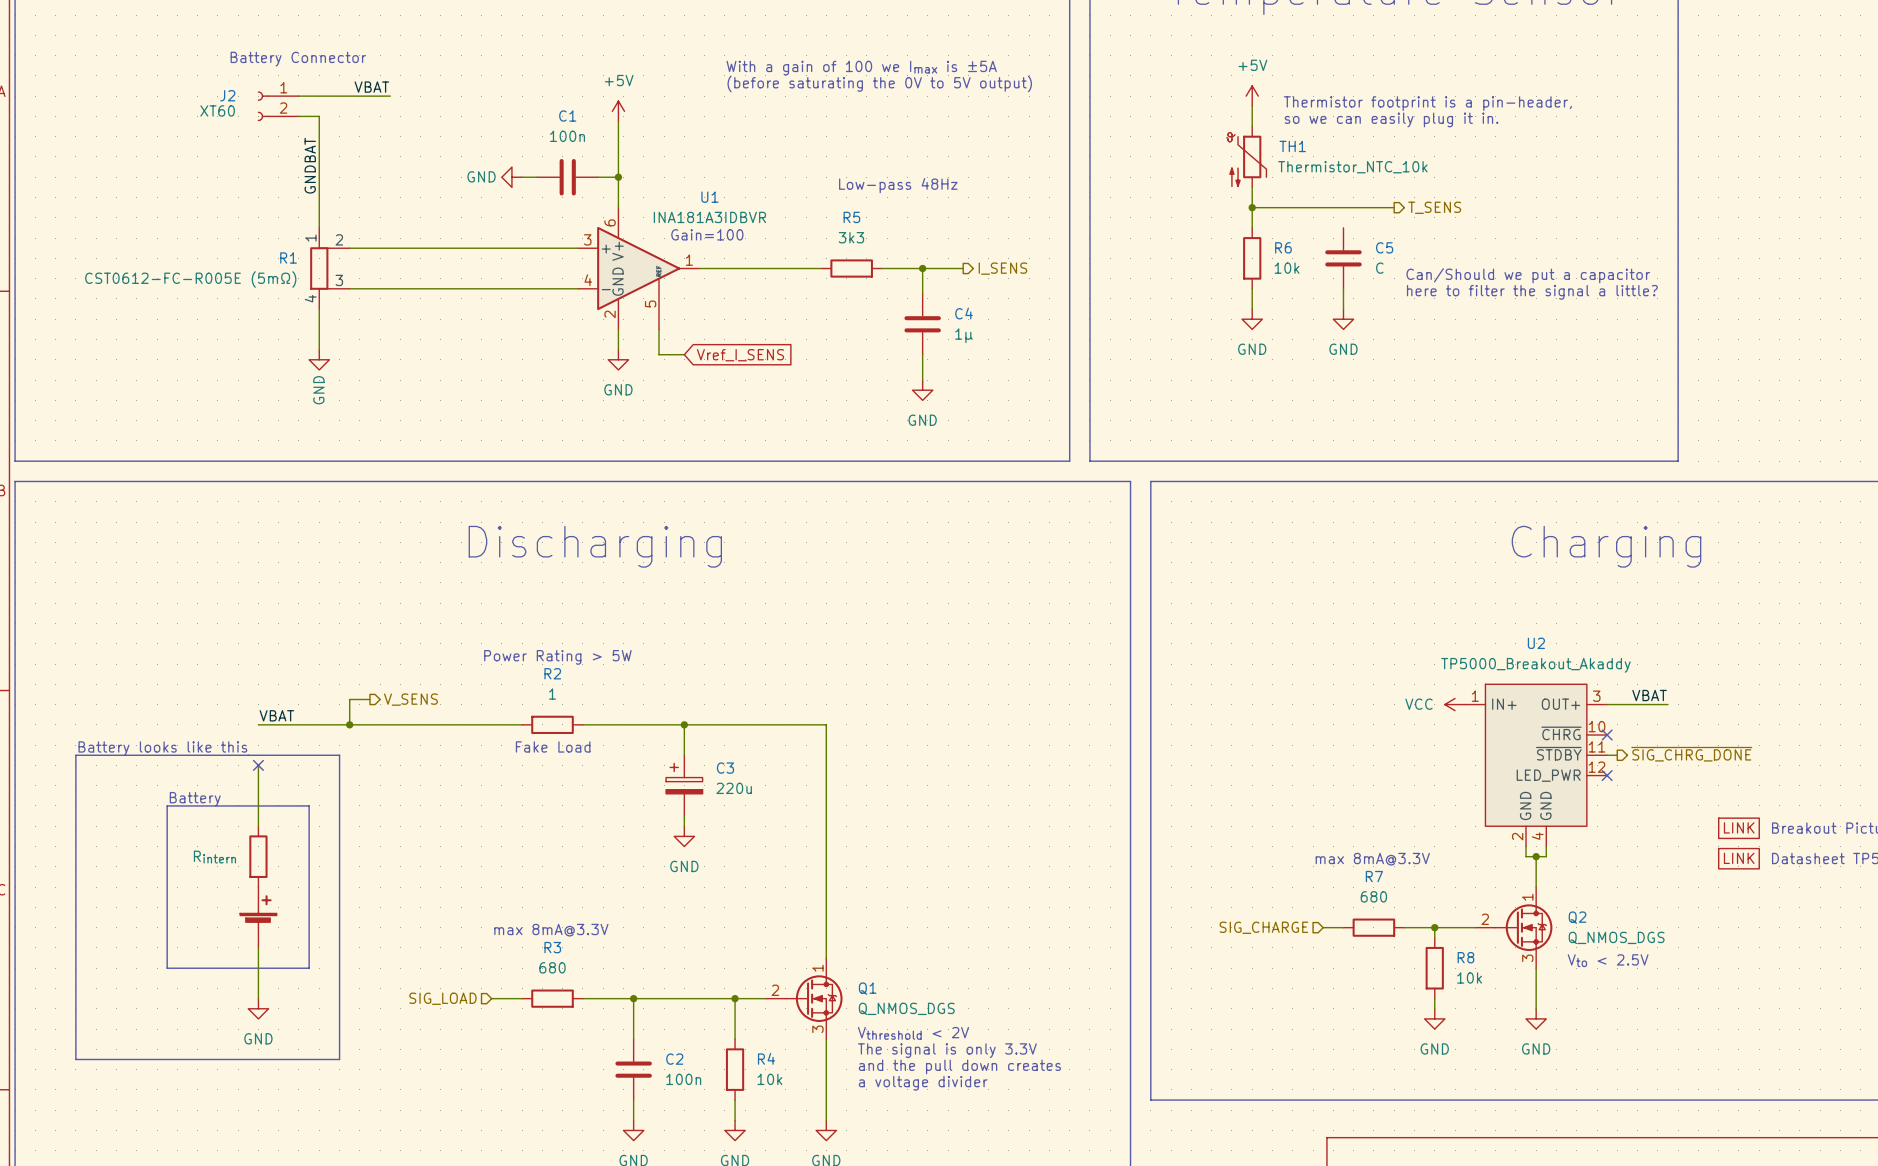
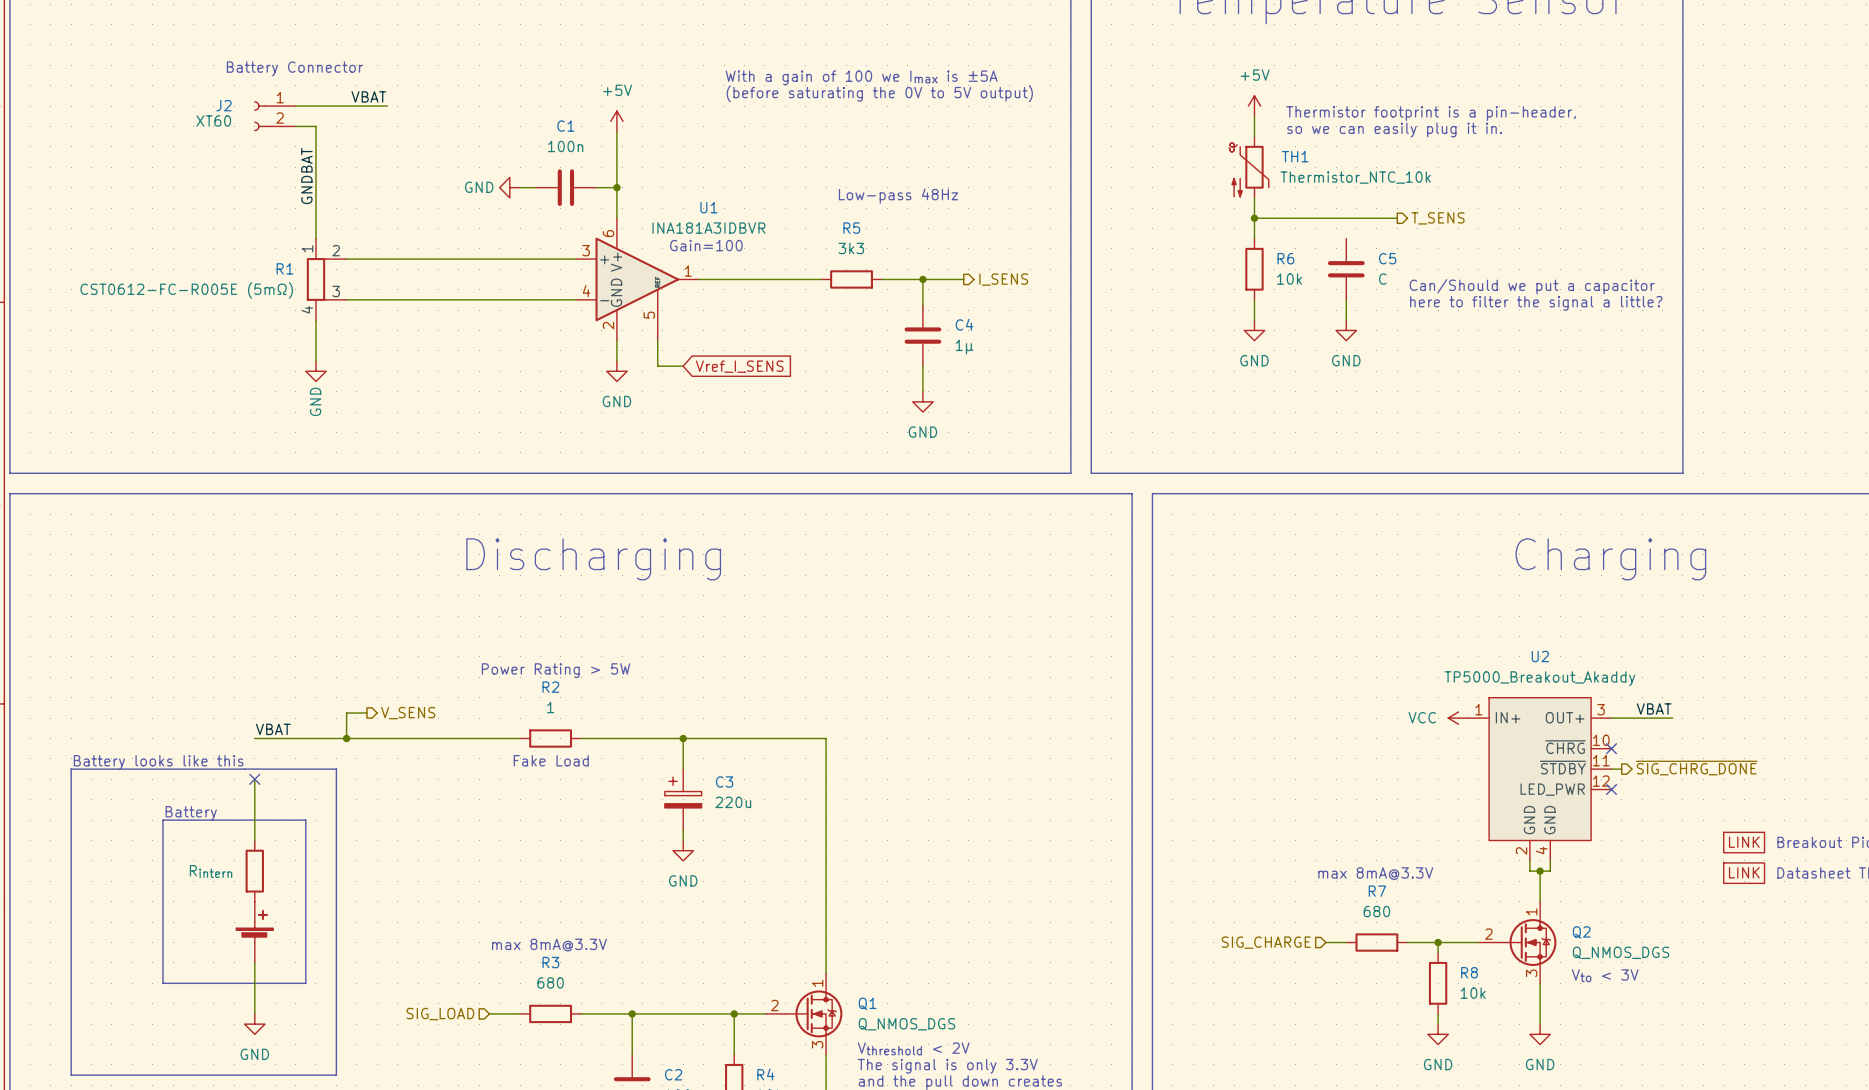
text: Vto < 2.5V (1608, 960) -> Vto < 3V (1605, 975)

